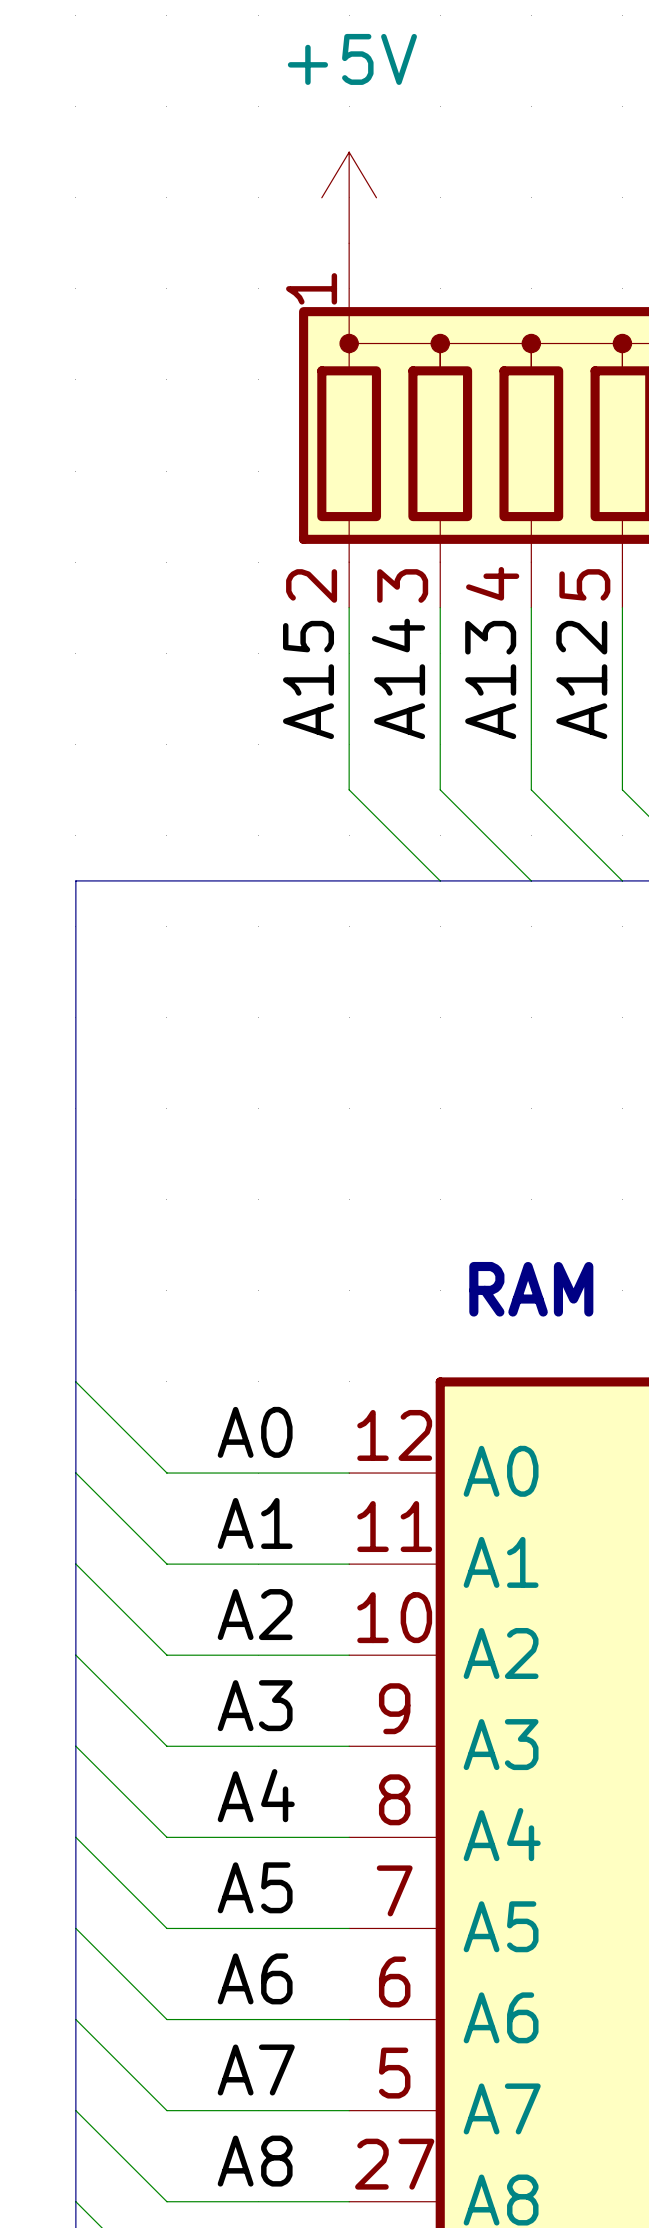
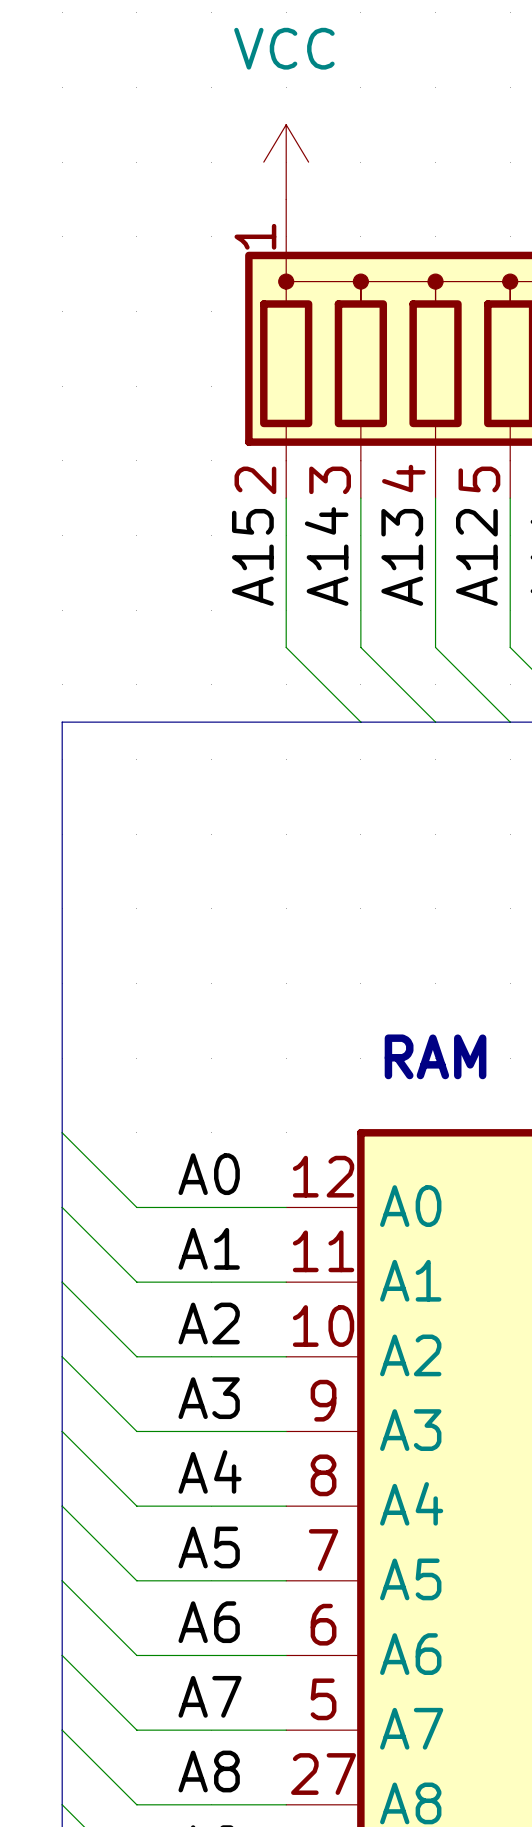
power symbol: +5V (349, 197) -> VCC (286, 162)

